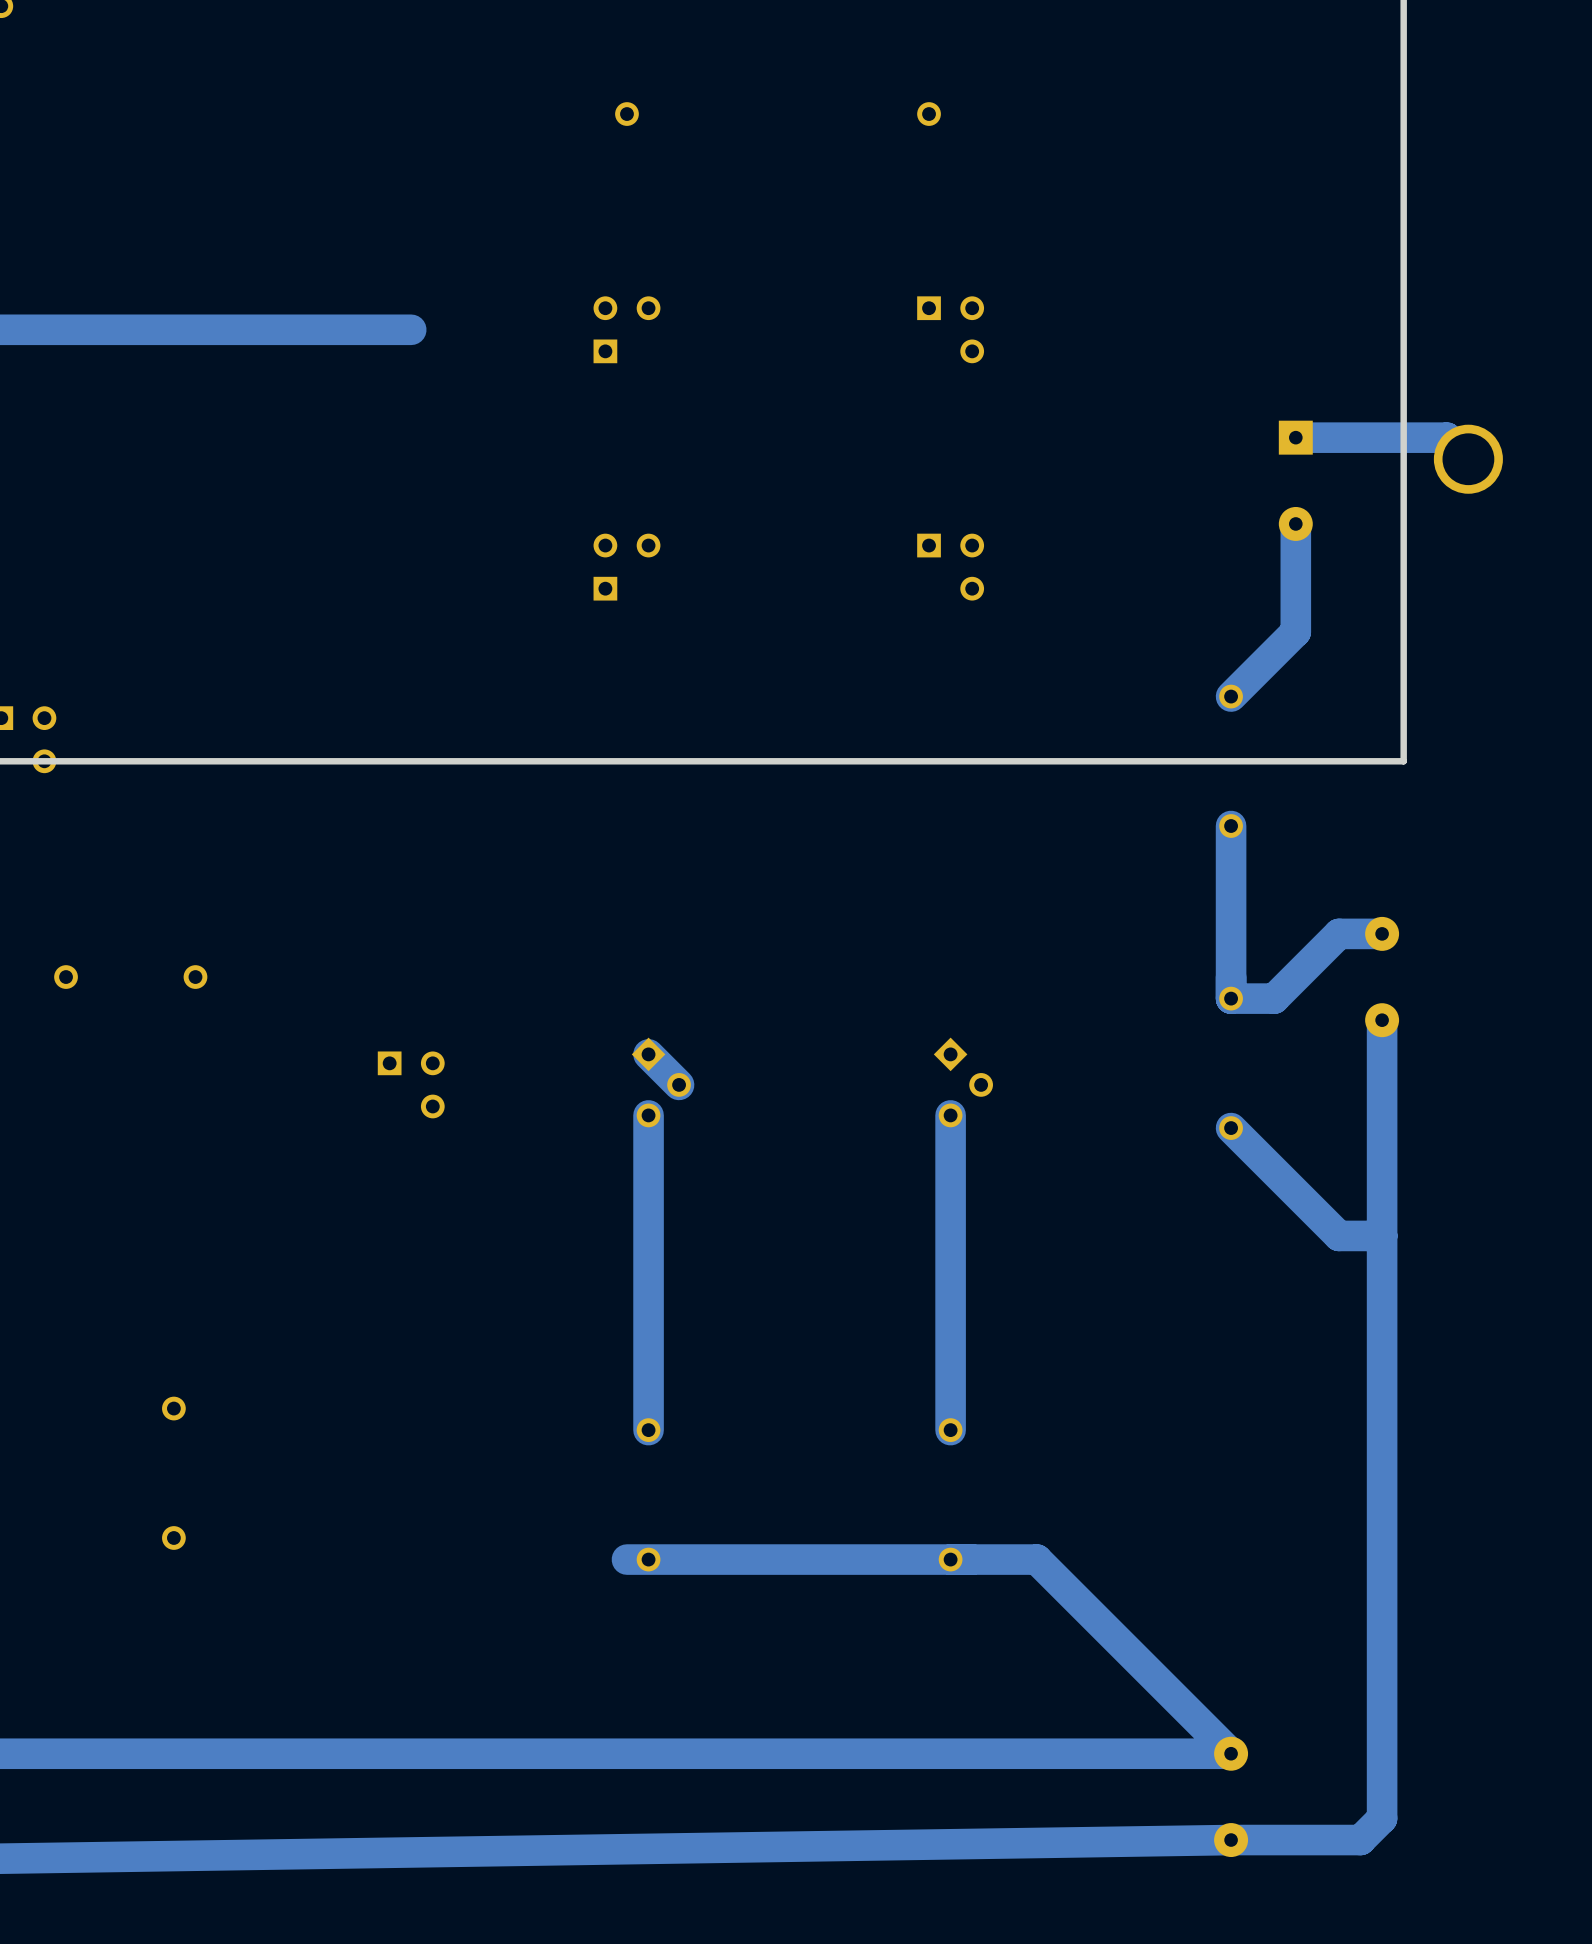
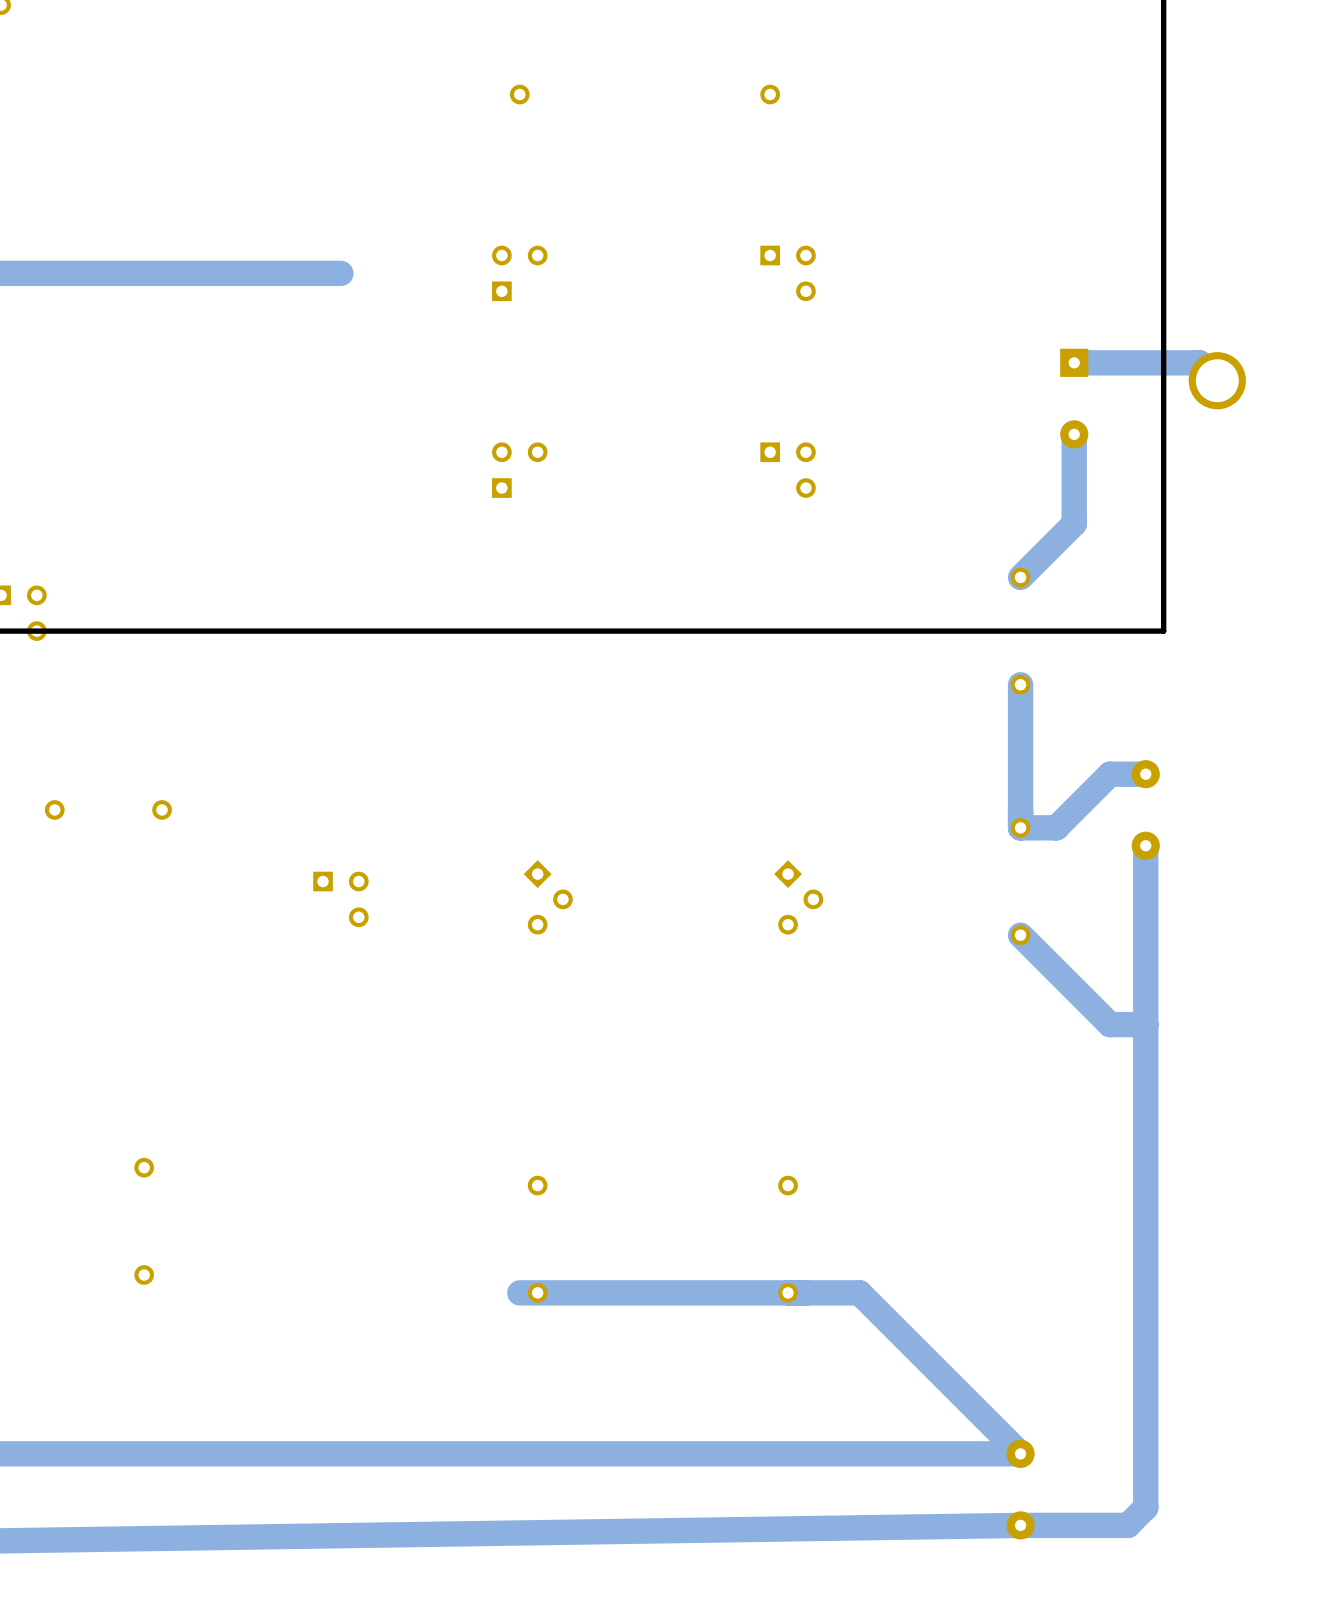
bottom track: (648, 1054) (679, 1084) -> none
bottom track: (648, 1115) (648, 1430) -> none
bottom track: (950, 1115) (950, 1430) -> none

